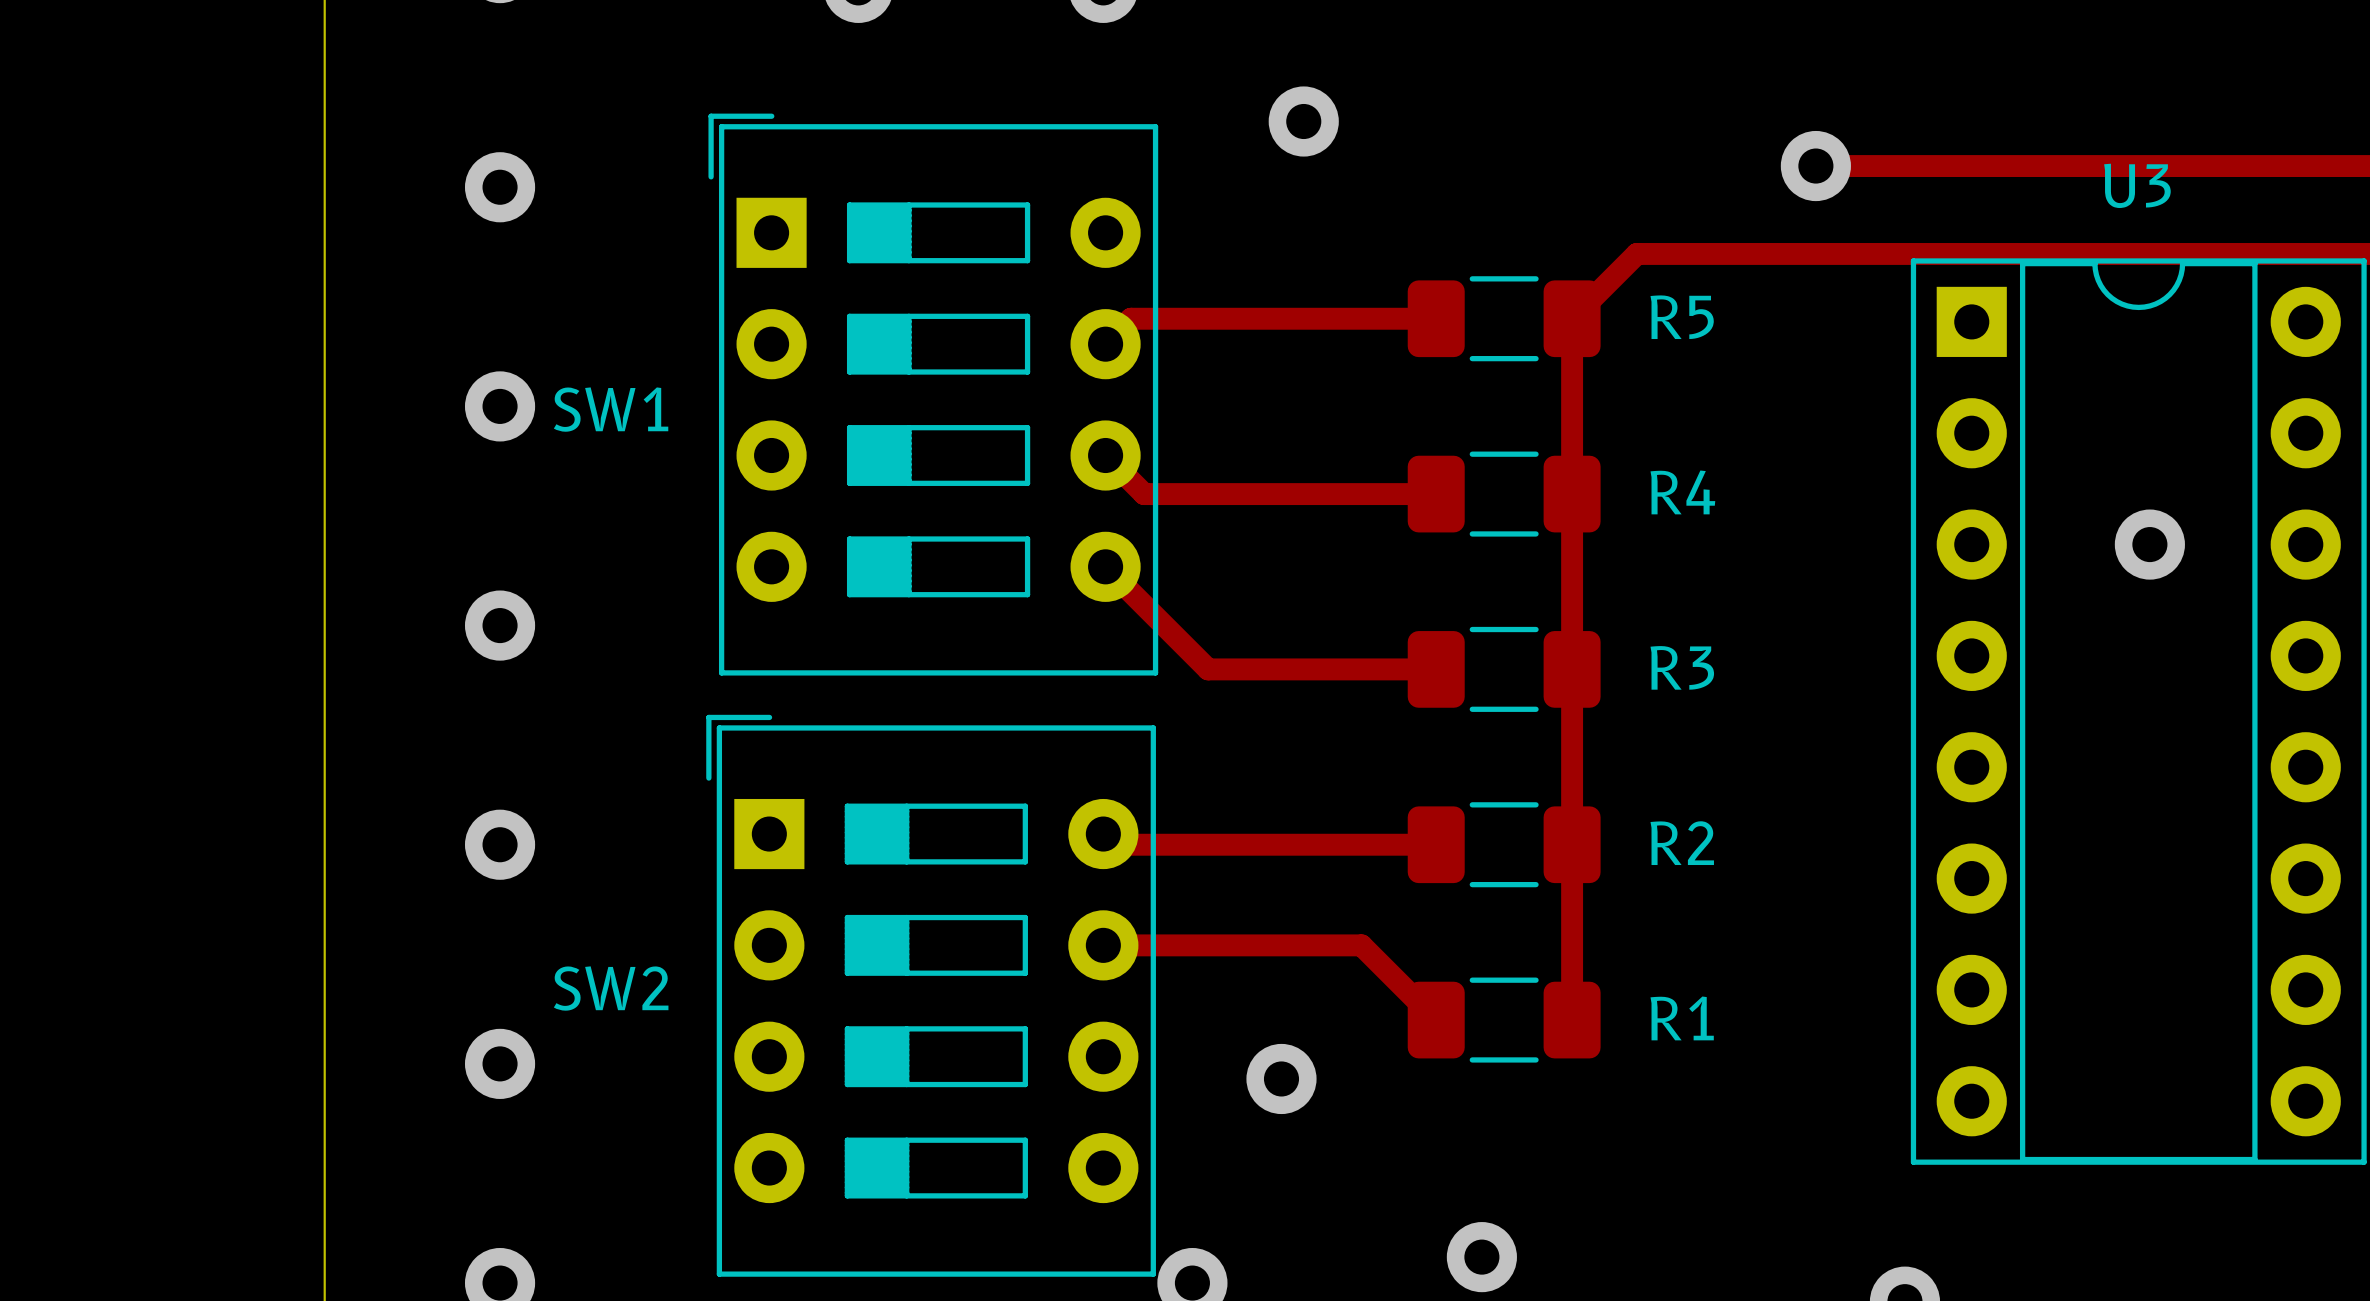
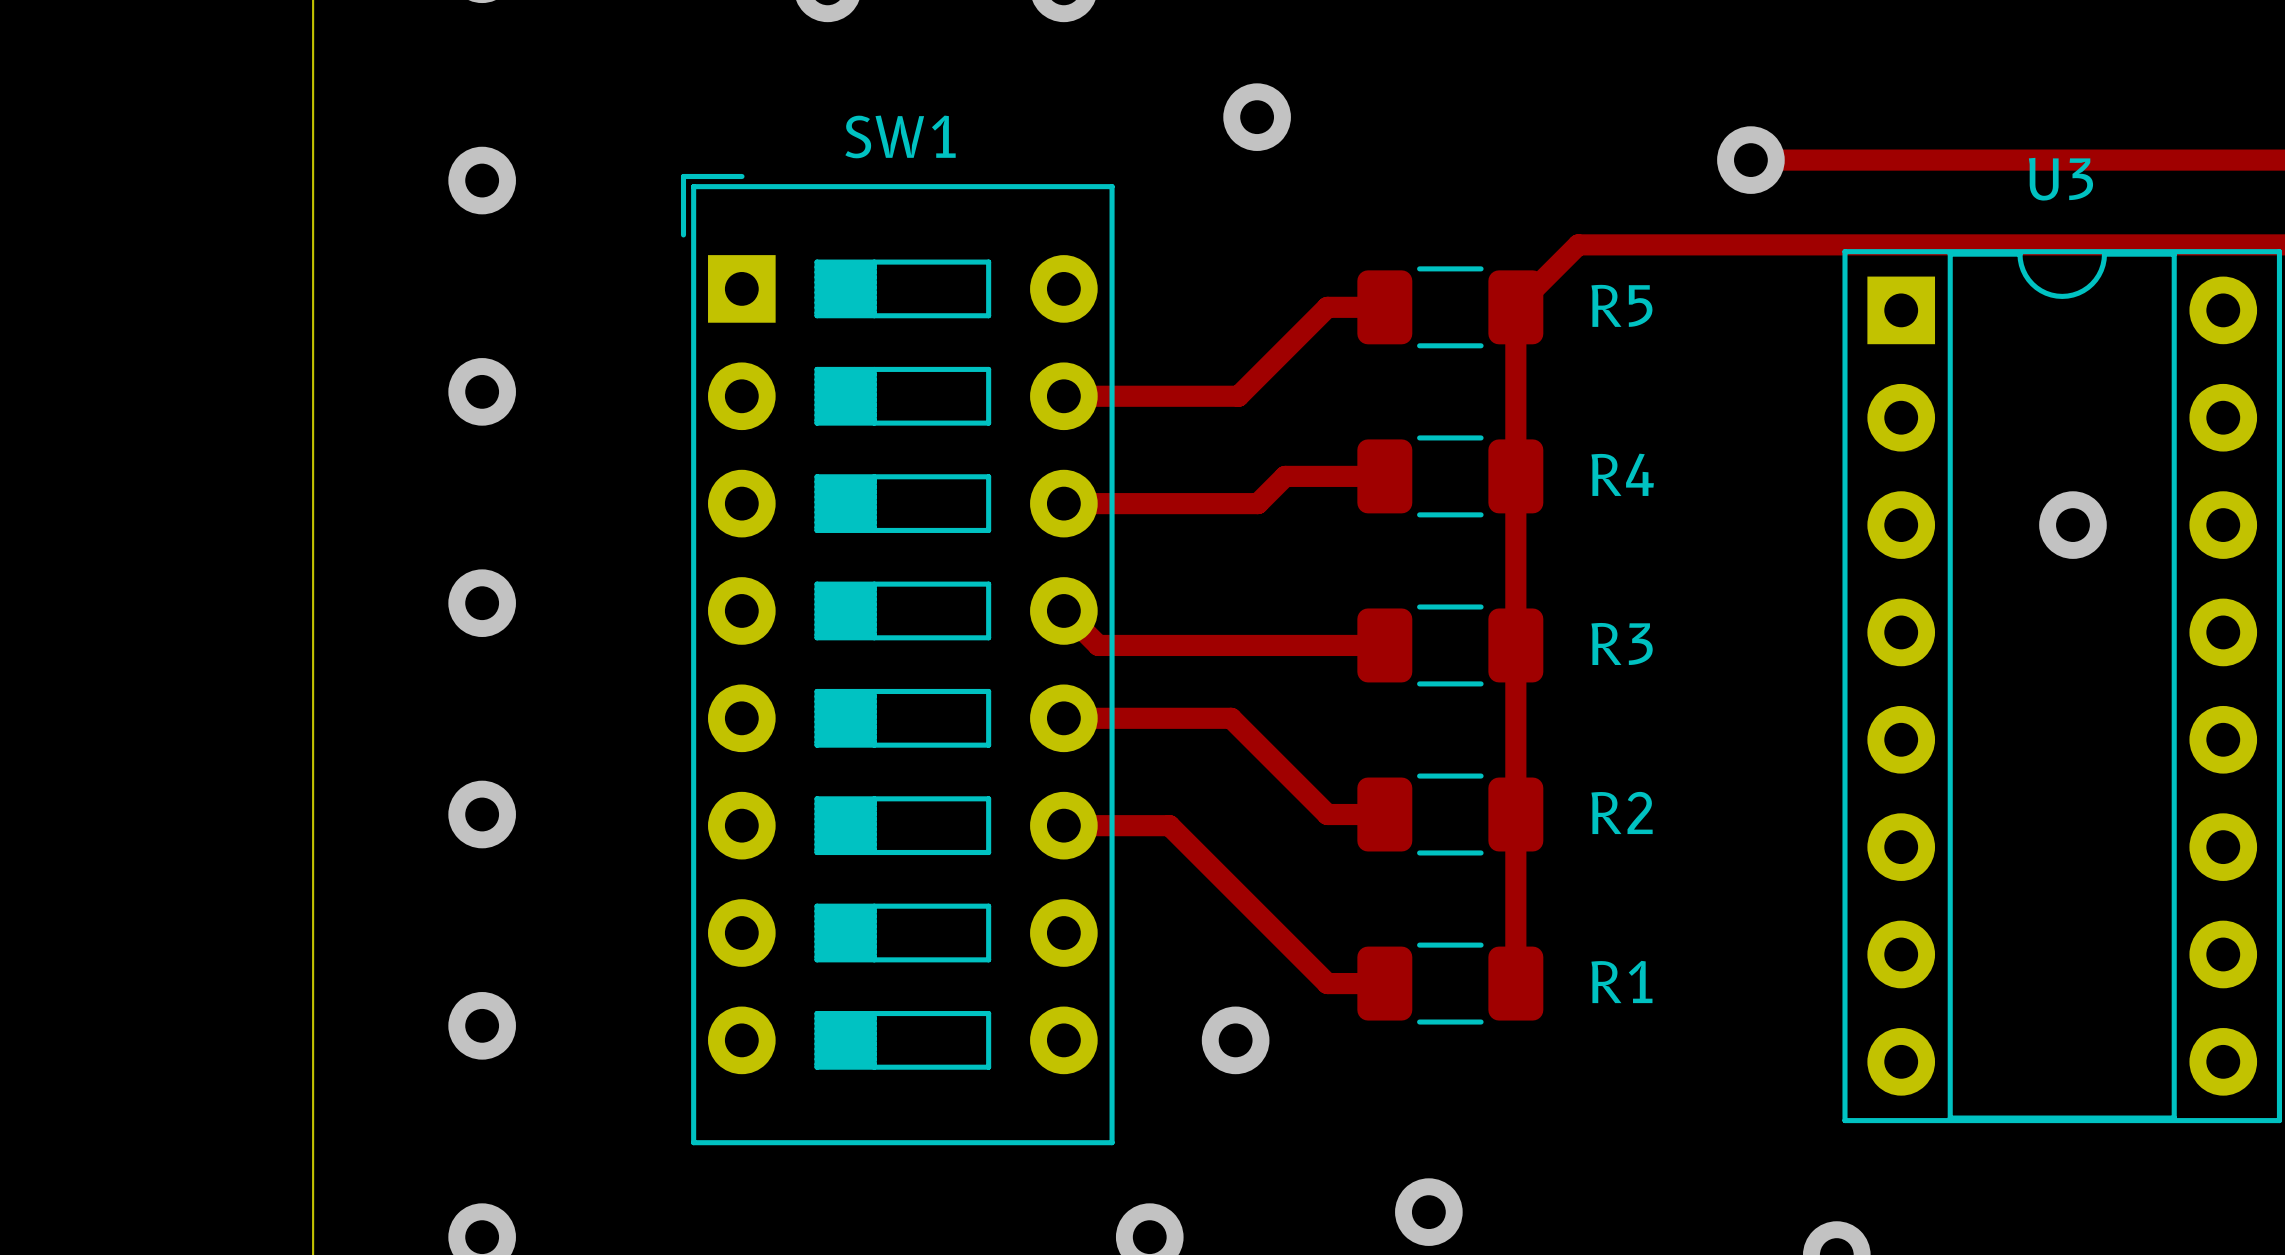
SW1 footprint: [708, 113, 1159, 676] -> [680, 173, 1115, 1146]
track: (1376, 318) (1131, 318) (1105, 344) -> (1327, 307) (1238, 396) (1063, 396)
SW1 name position: SW1 (611, 409) -> SW1 (900, 136)
track: (1105, 455) (1144, 494) (1332, 494) -> (1063, 503) (1257, 503) (1285, 476)
track: (1105, 566) (1208, 669) -> (1063, 610) (1098, 645) (1164, 645)
track: (1103, 834) (1114, 844) (1376, 844) -> (1063, 718) (1231, 718) (1327, 814)
track: (1103, 945) (1361, 945) (1436, 1020) -> (1063, 825) (1169, 825) (1327, 983) (1384, 983)
SW2: (931, 995) -> none

